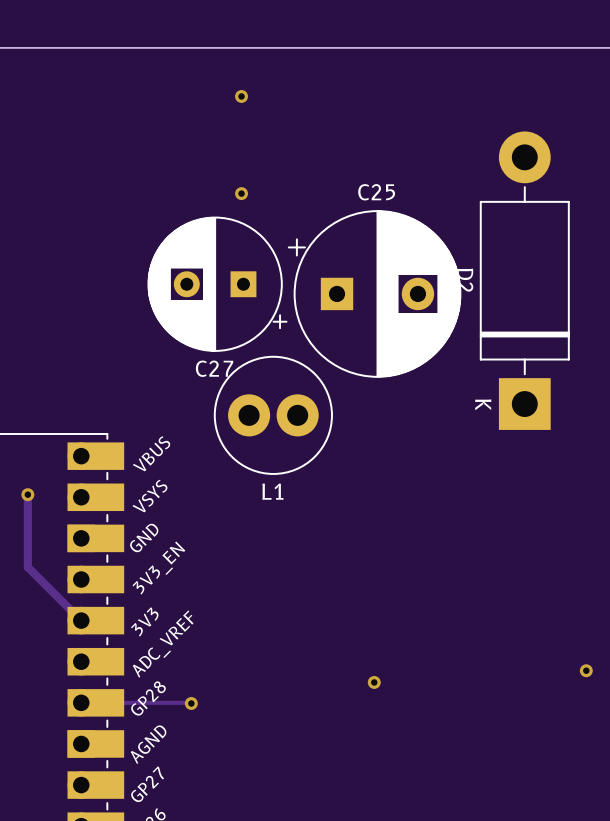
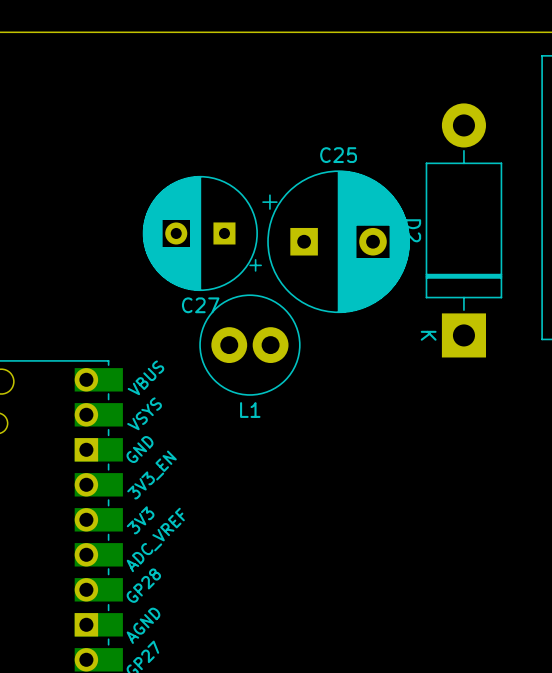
via: (241, 96) -> none
via: (241, 193) -> none
track: (27, 494) (27, 567) (81, 620) -> none
via: (27, 494) -> none
via: (586, 670) -> none
via: (374, 682) -> none
track: (81, 702) (191, 703) -> none
via: (191, 703) -> none

